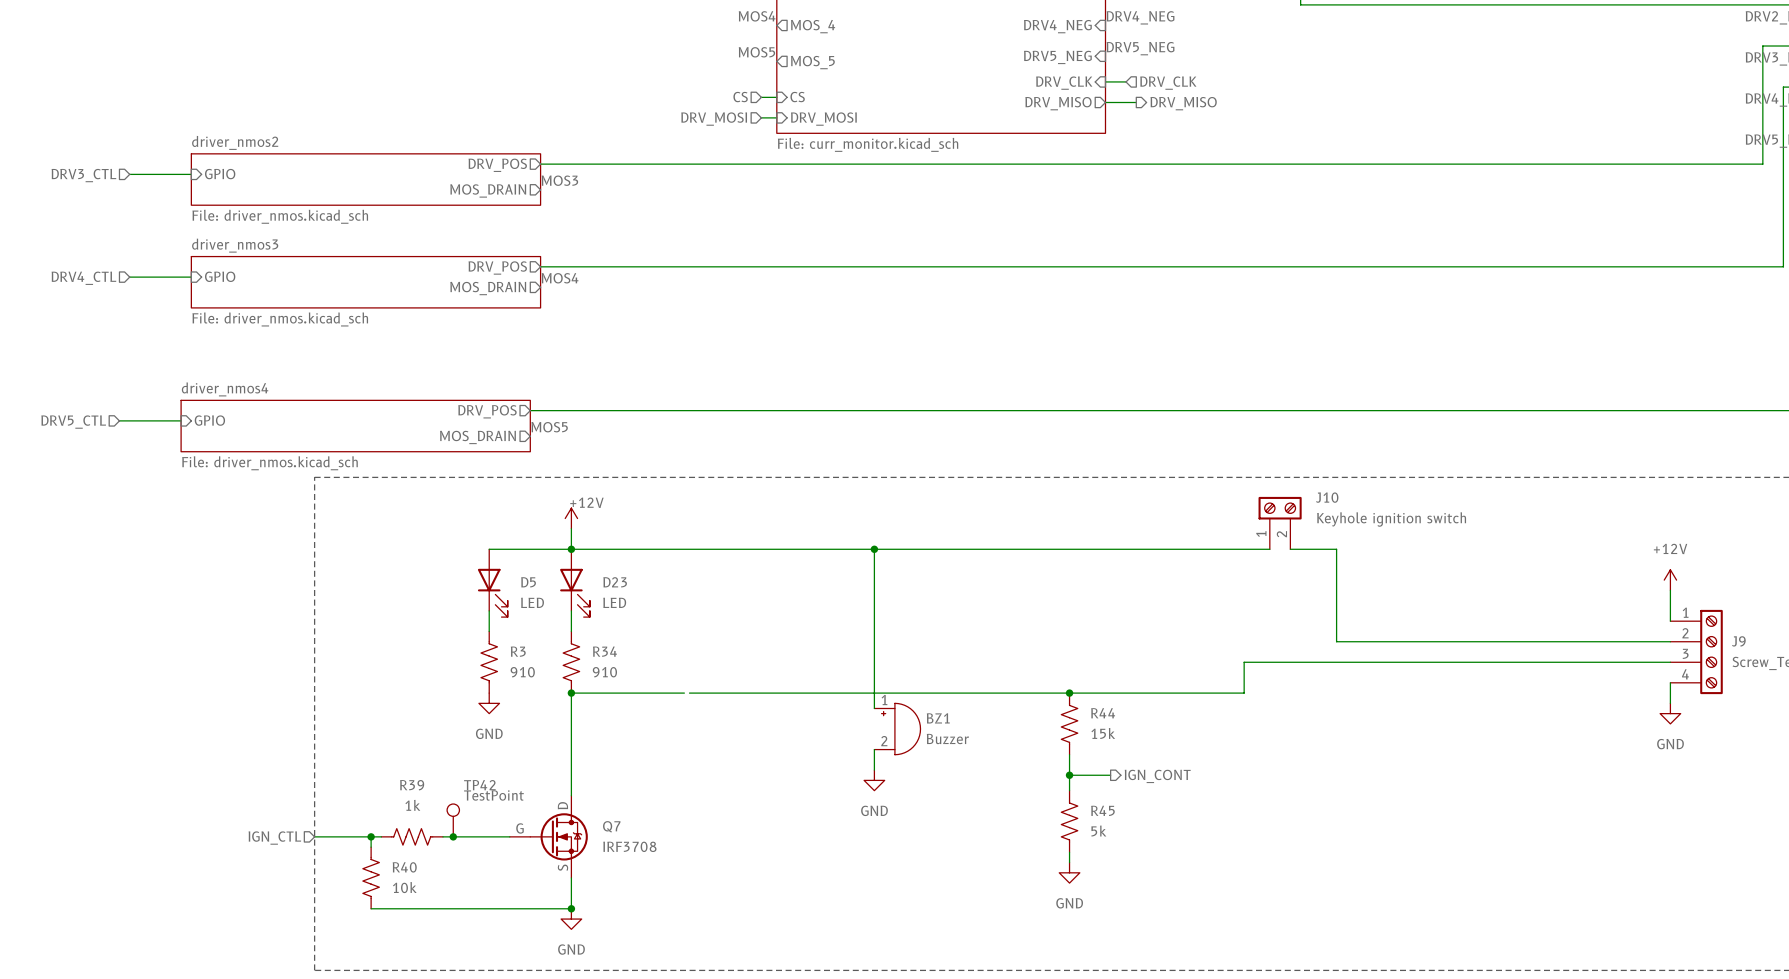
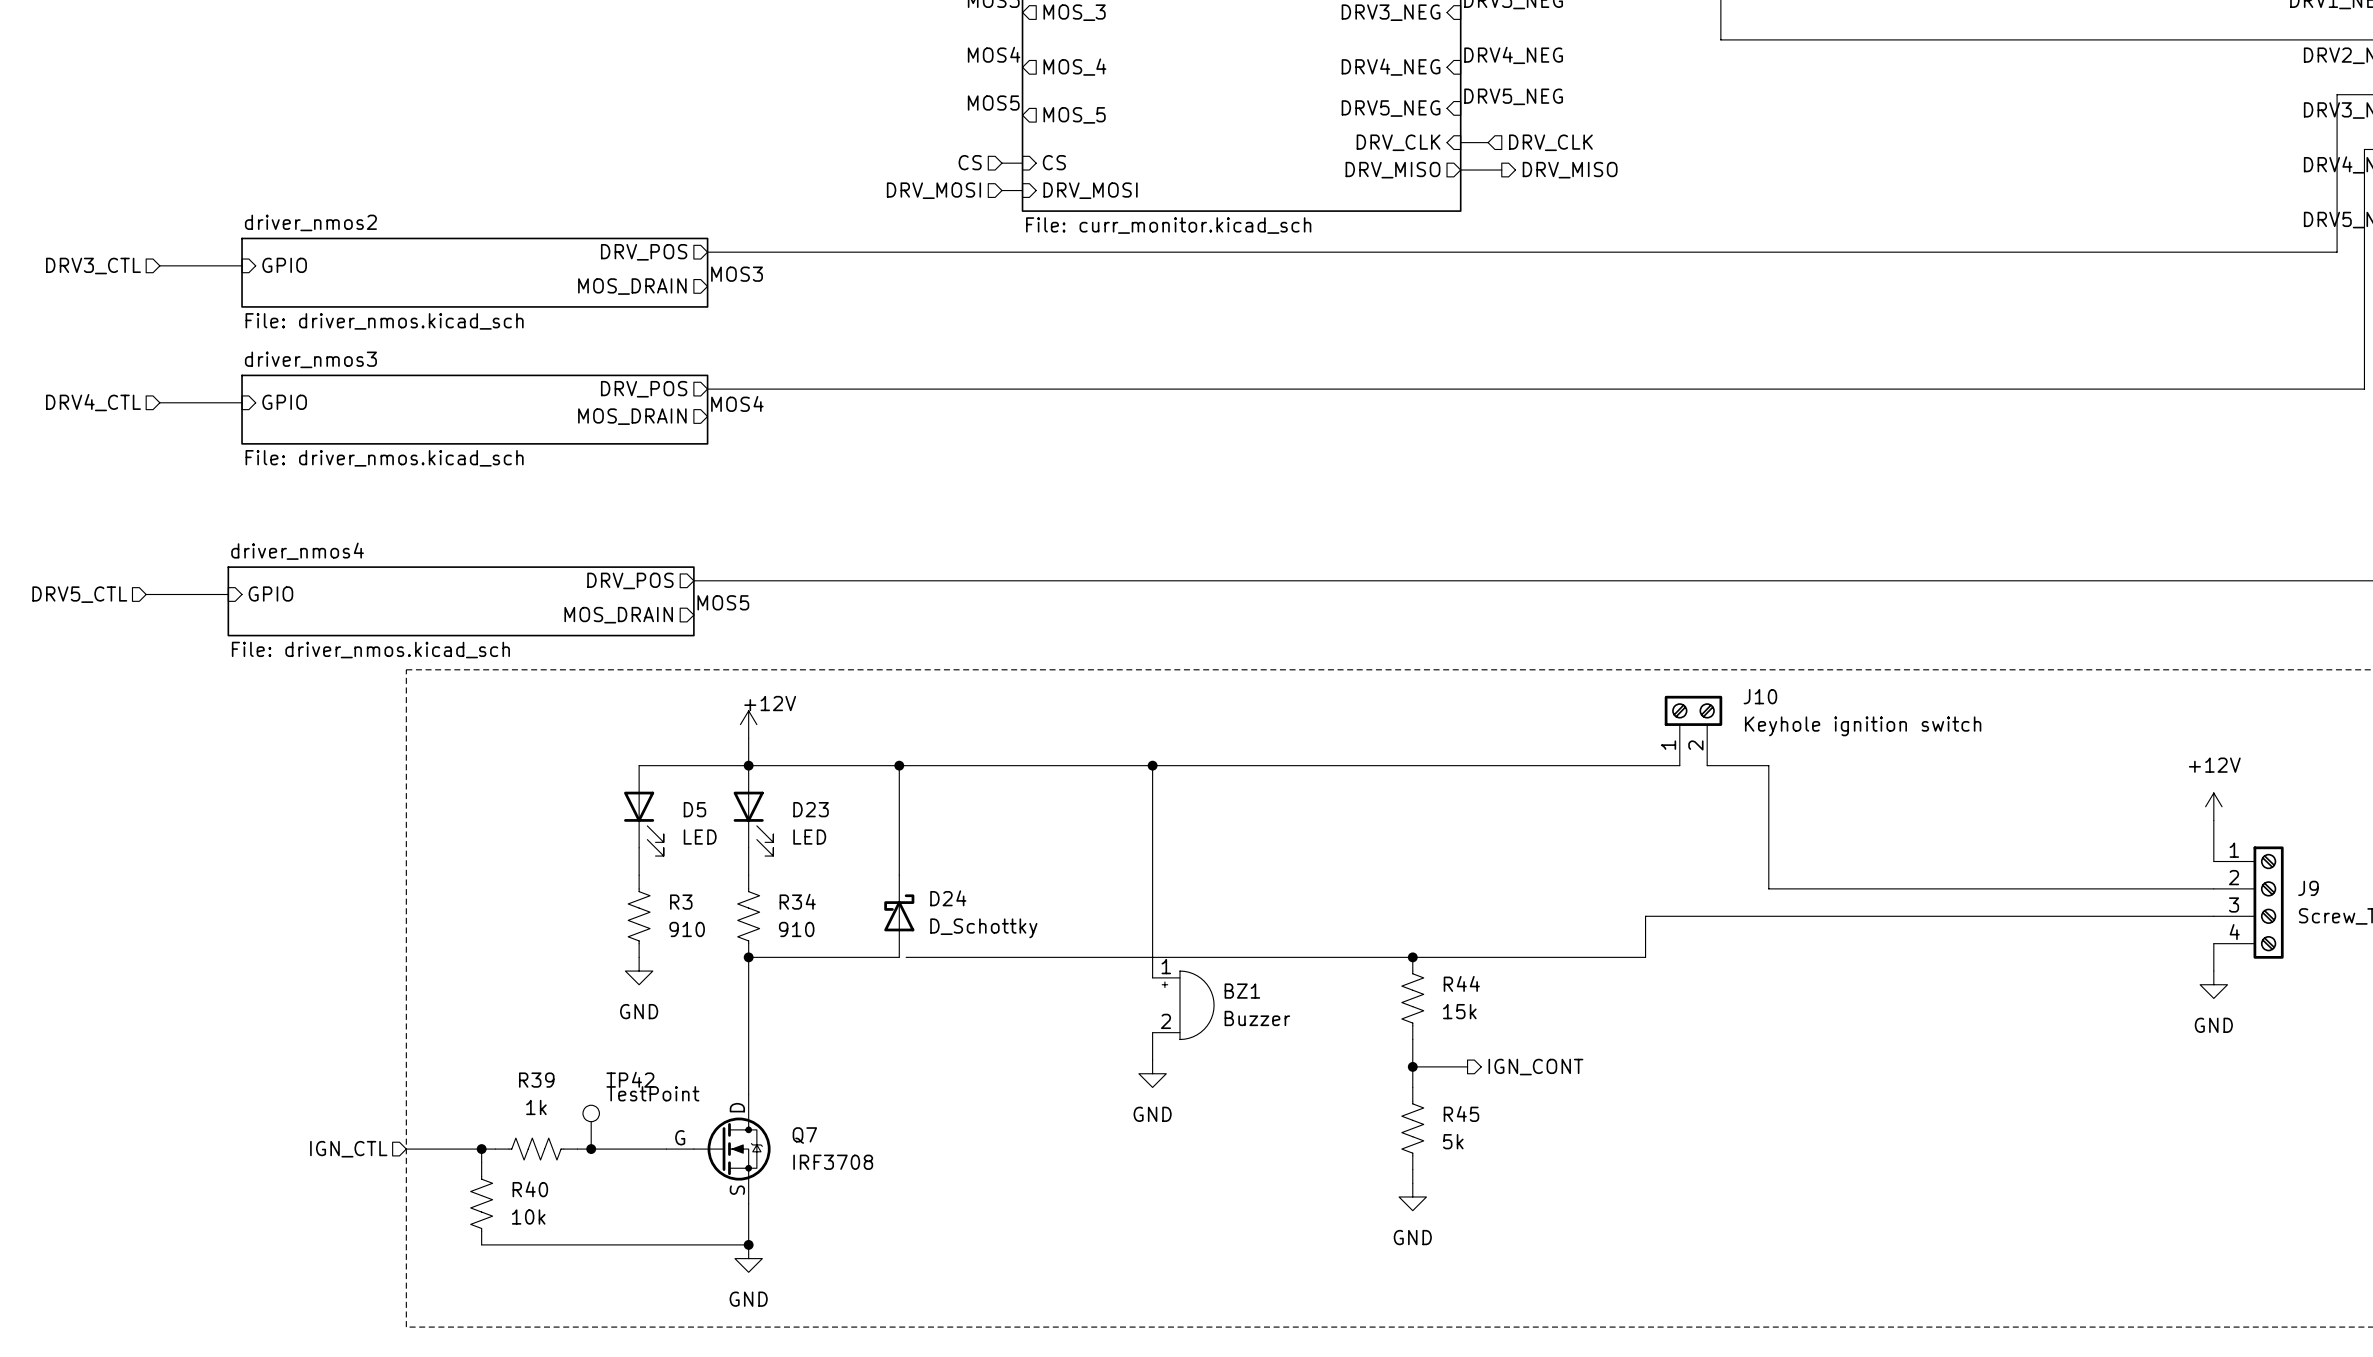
wire: none -> (899, 765) (899, 875)
junction: none -> (899, 765)
D24: none -> D_Schottky (899, 916)

